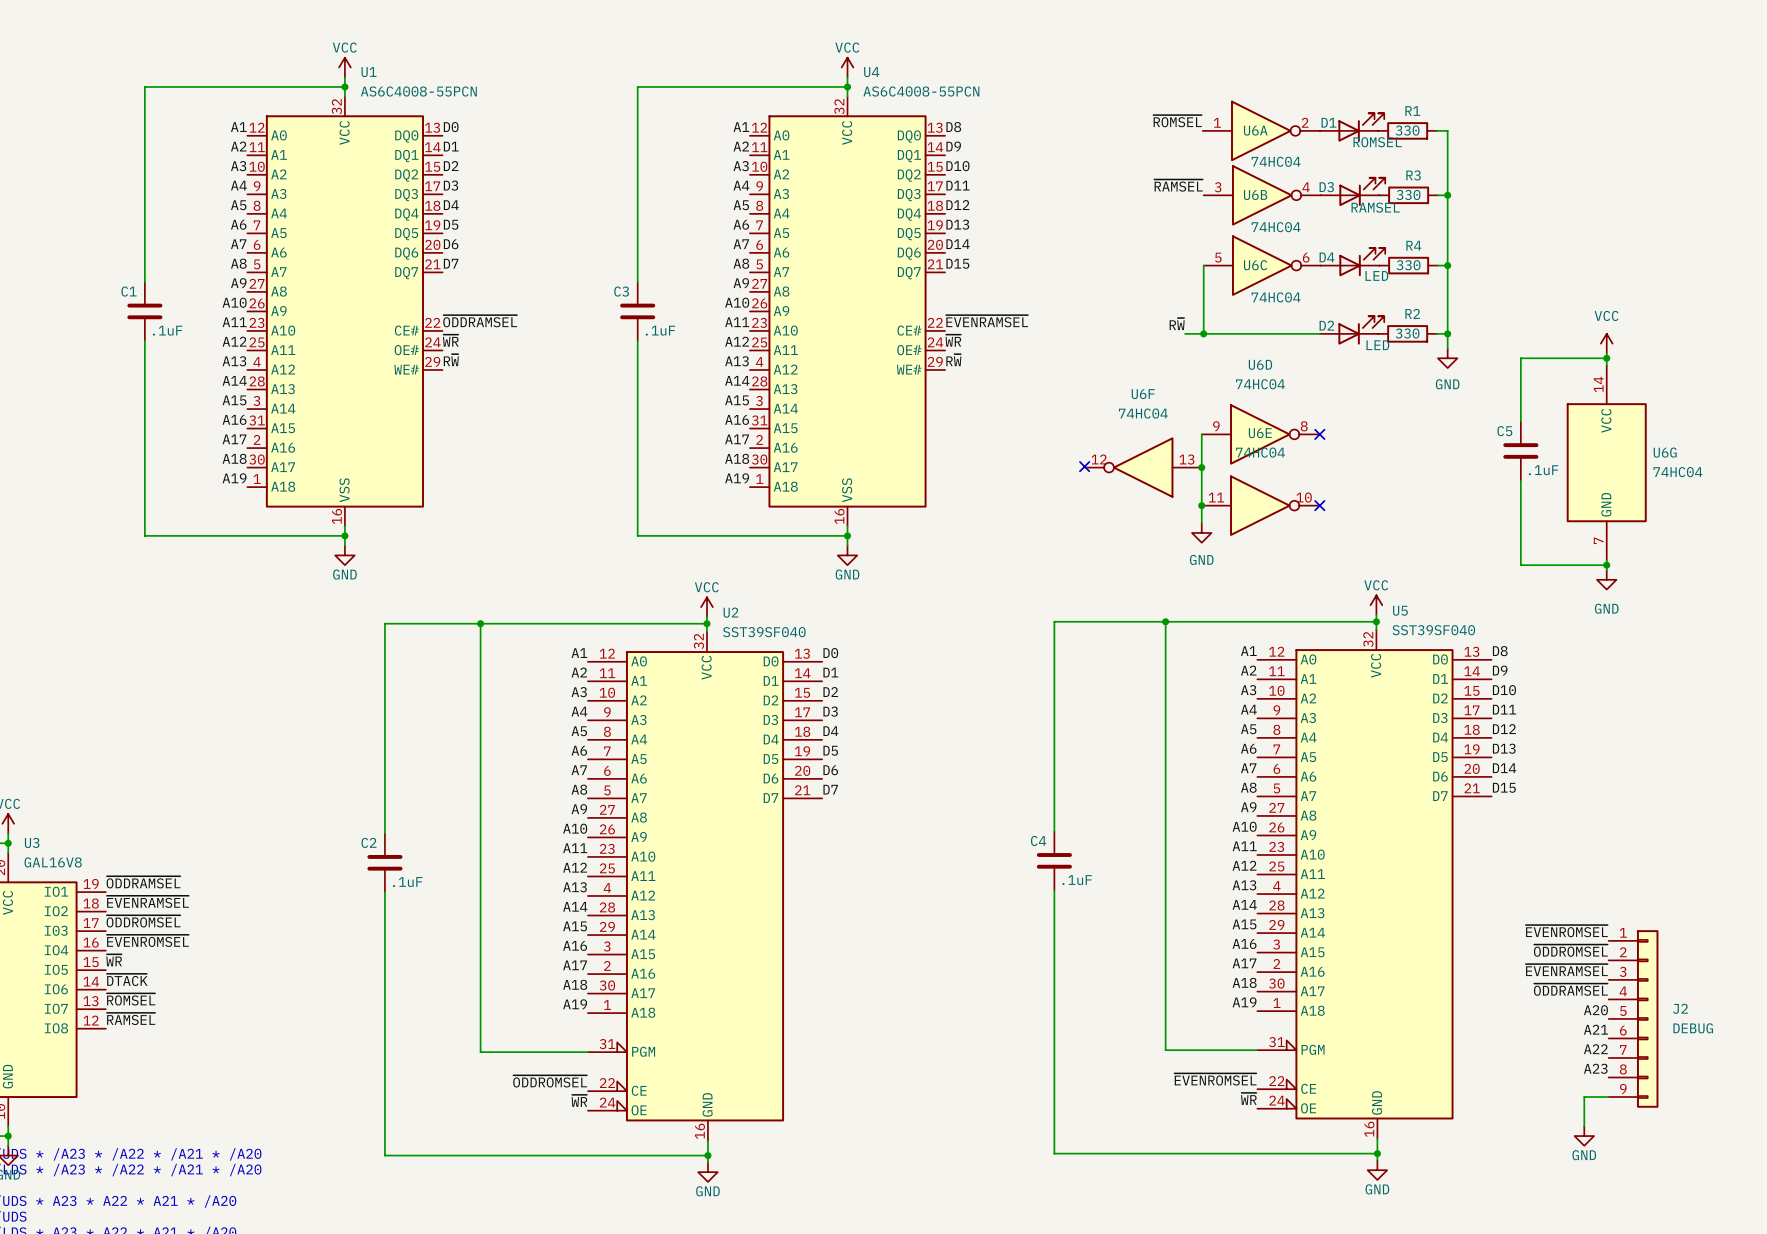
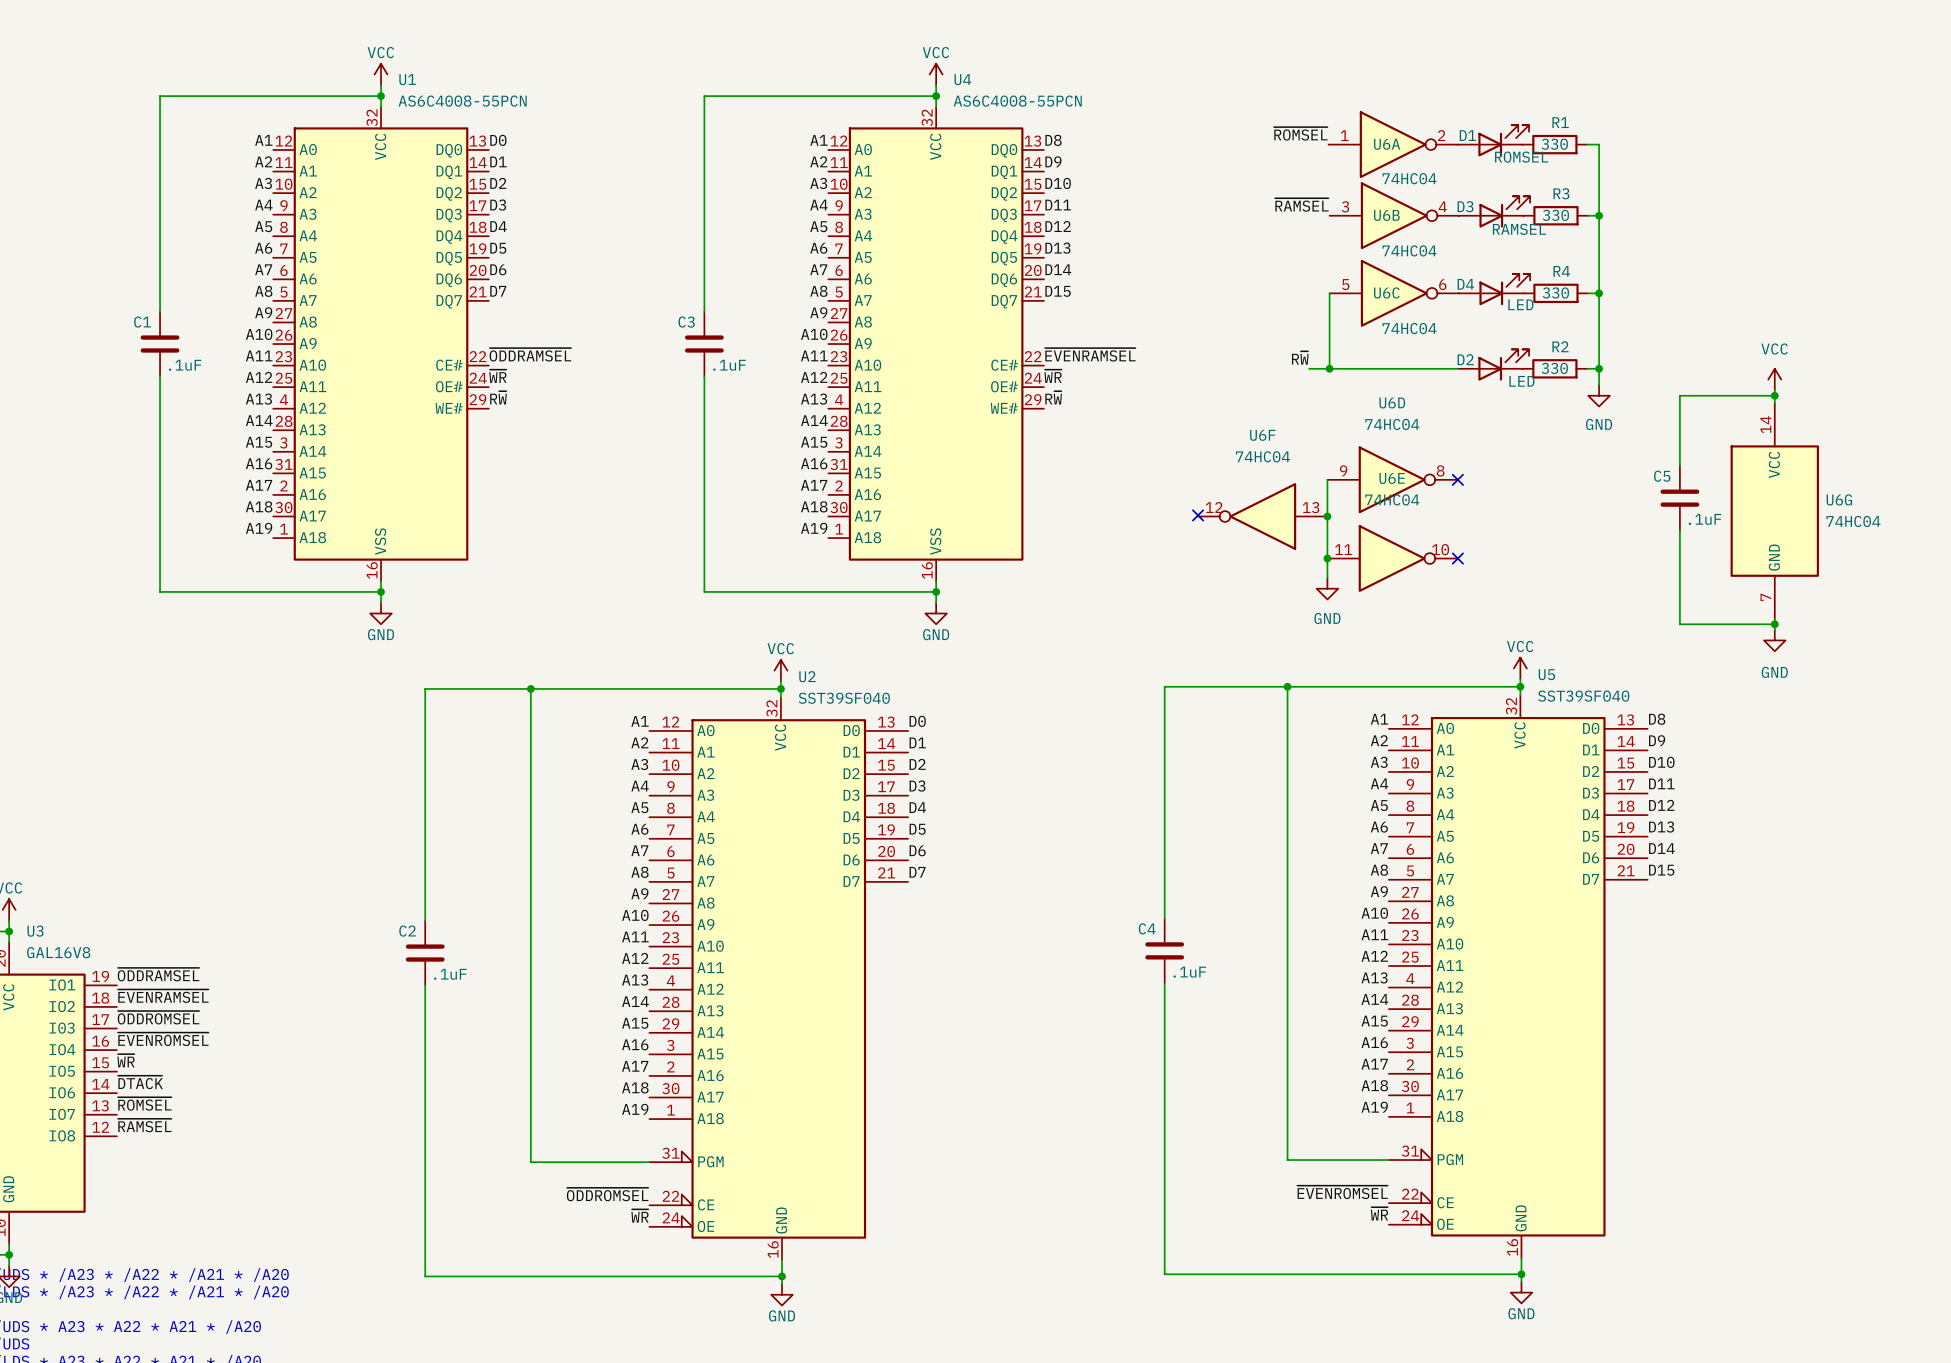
label: ~{EVENROMSEL} (1566, 931) -> none
label: ~{ODDROMSEL} (1570, 950) -> none
label: ~{EVENRAMSEL} (1566, 970) -> none
label: ~{ODDRAMSEL} (1570, 989) -> none
label: A20 (1595, 1010) -> none
J2: DEBUG (1633, 1018) -> none
label: A21 (1595, 1029) -> none
label: A22 (1595, 1049) -> none
label: A23 (1595, 1068) -> none
wire: (1608, 1097) (1584, 1097) (1584, 1126) -> none
power symbol: GND (1584, 1136) -> none

